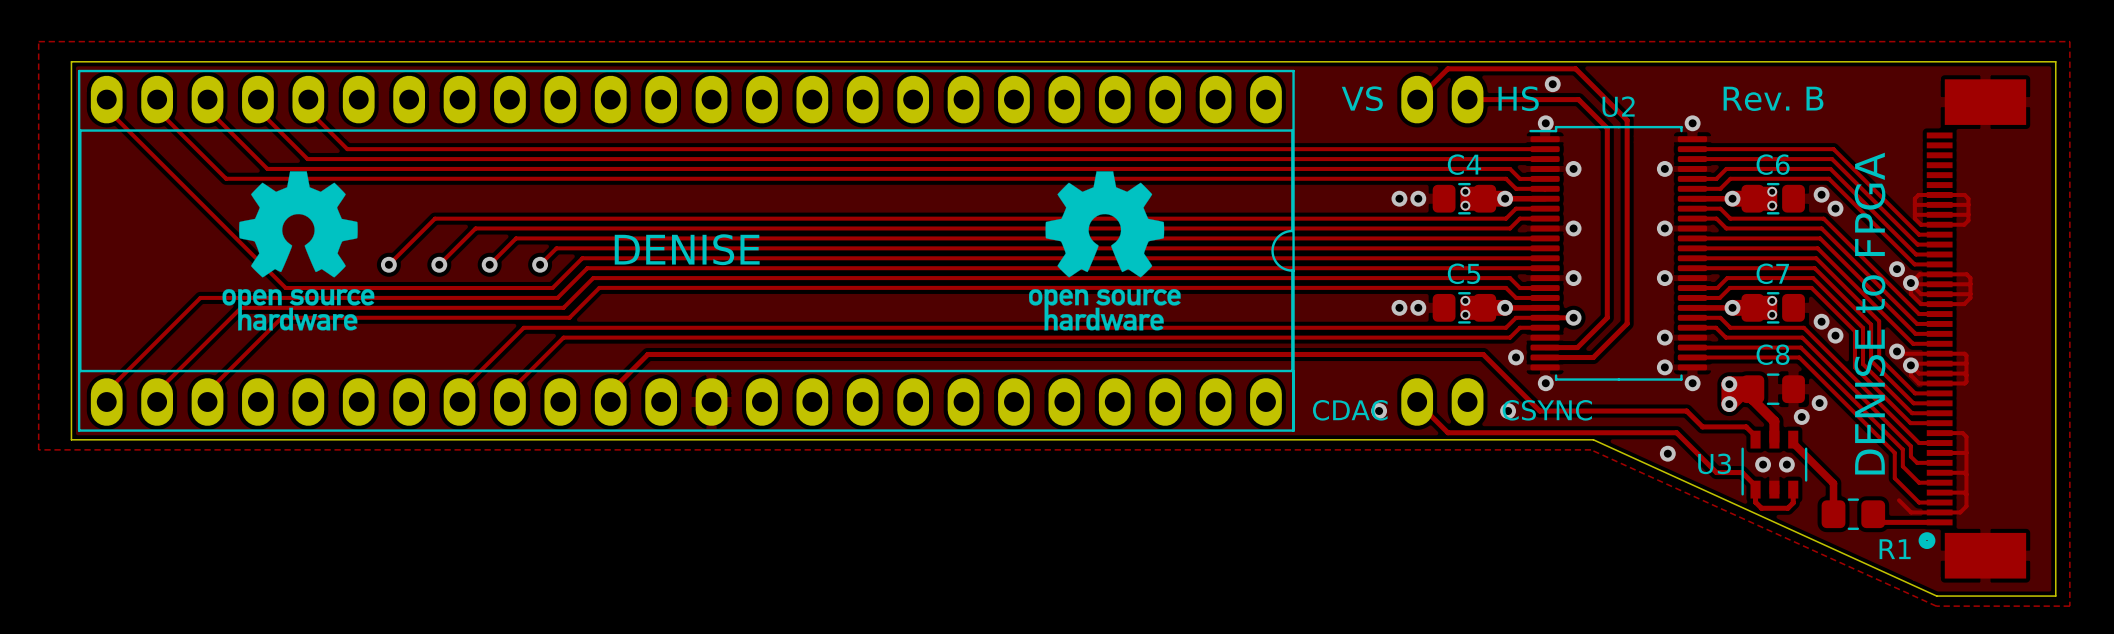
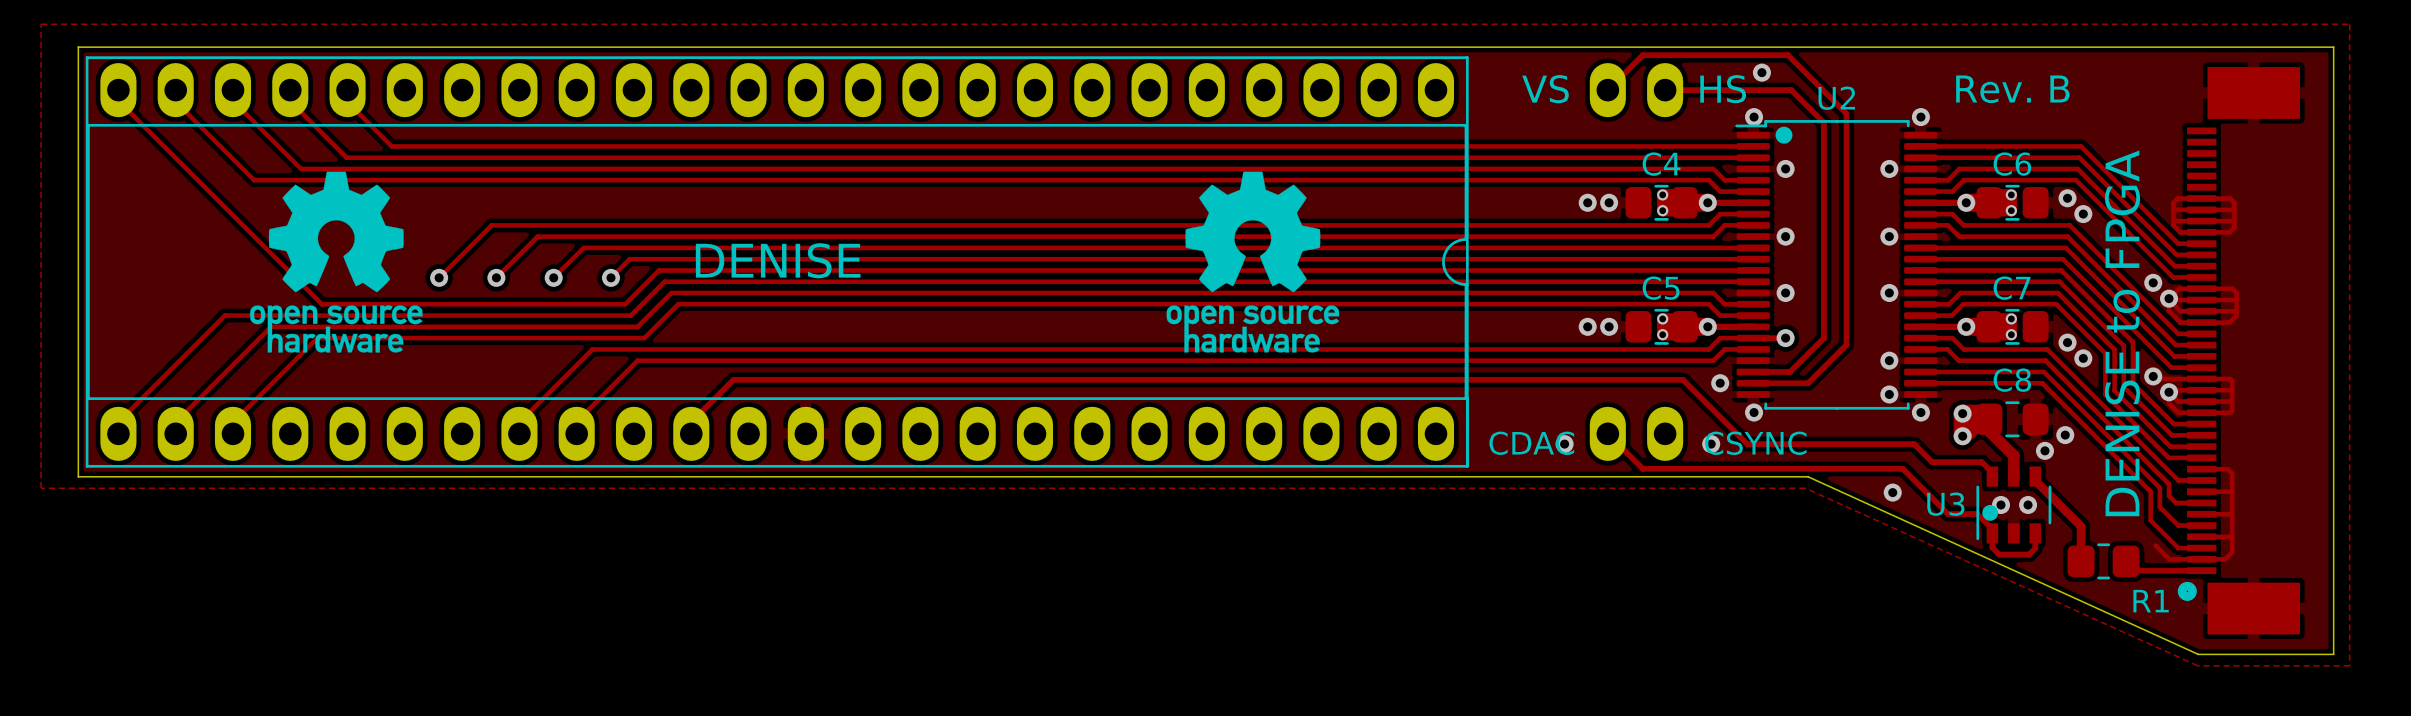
U2 footprint: [1529, 125, 1708, 381] -> [1735, 120, 1938, 410]
U3 footprint: [1741, 430, 1808, 499] -> [1976, 466, 2052, 544]

